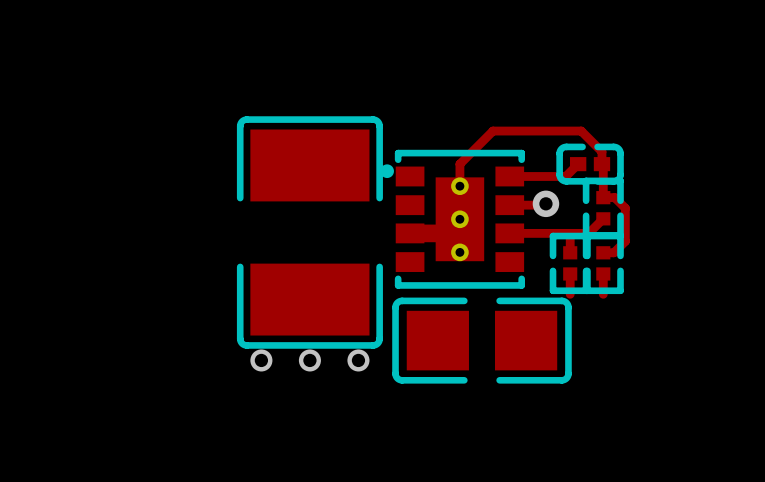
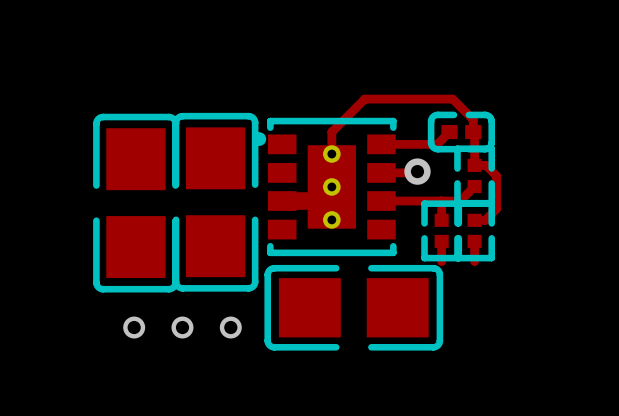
part: (309, 232) -> none
part: none -> (215, 202)
part: none -> (135, 203)

